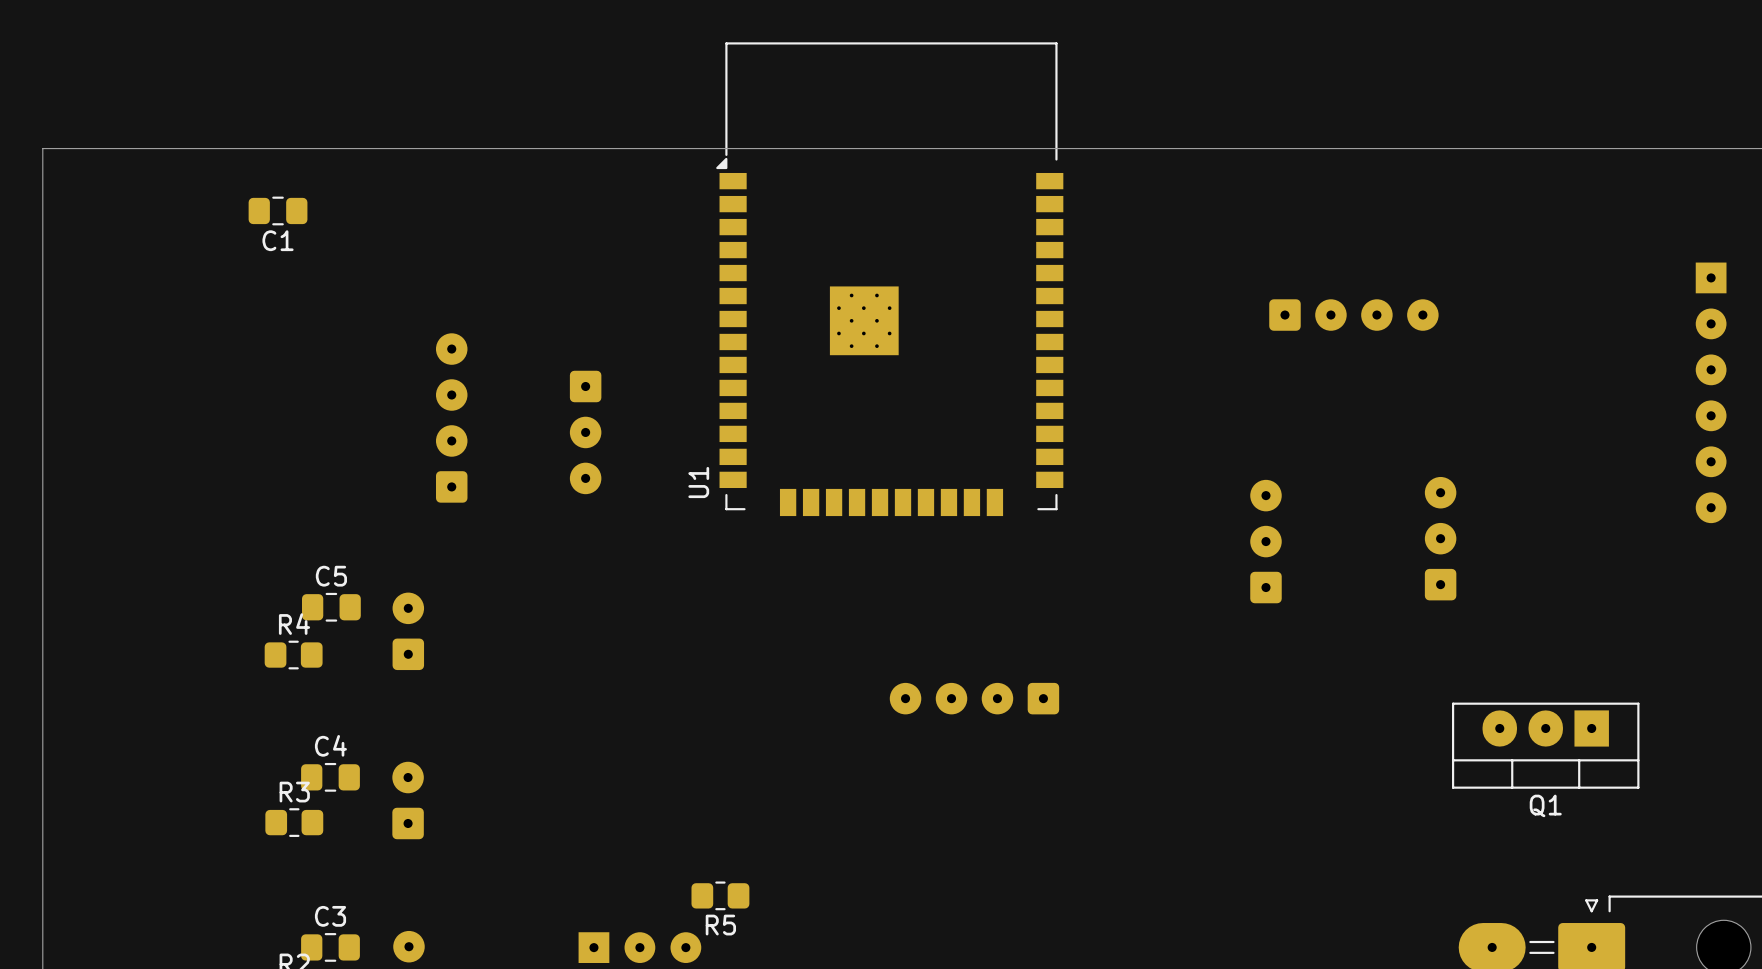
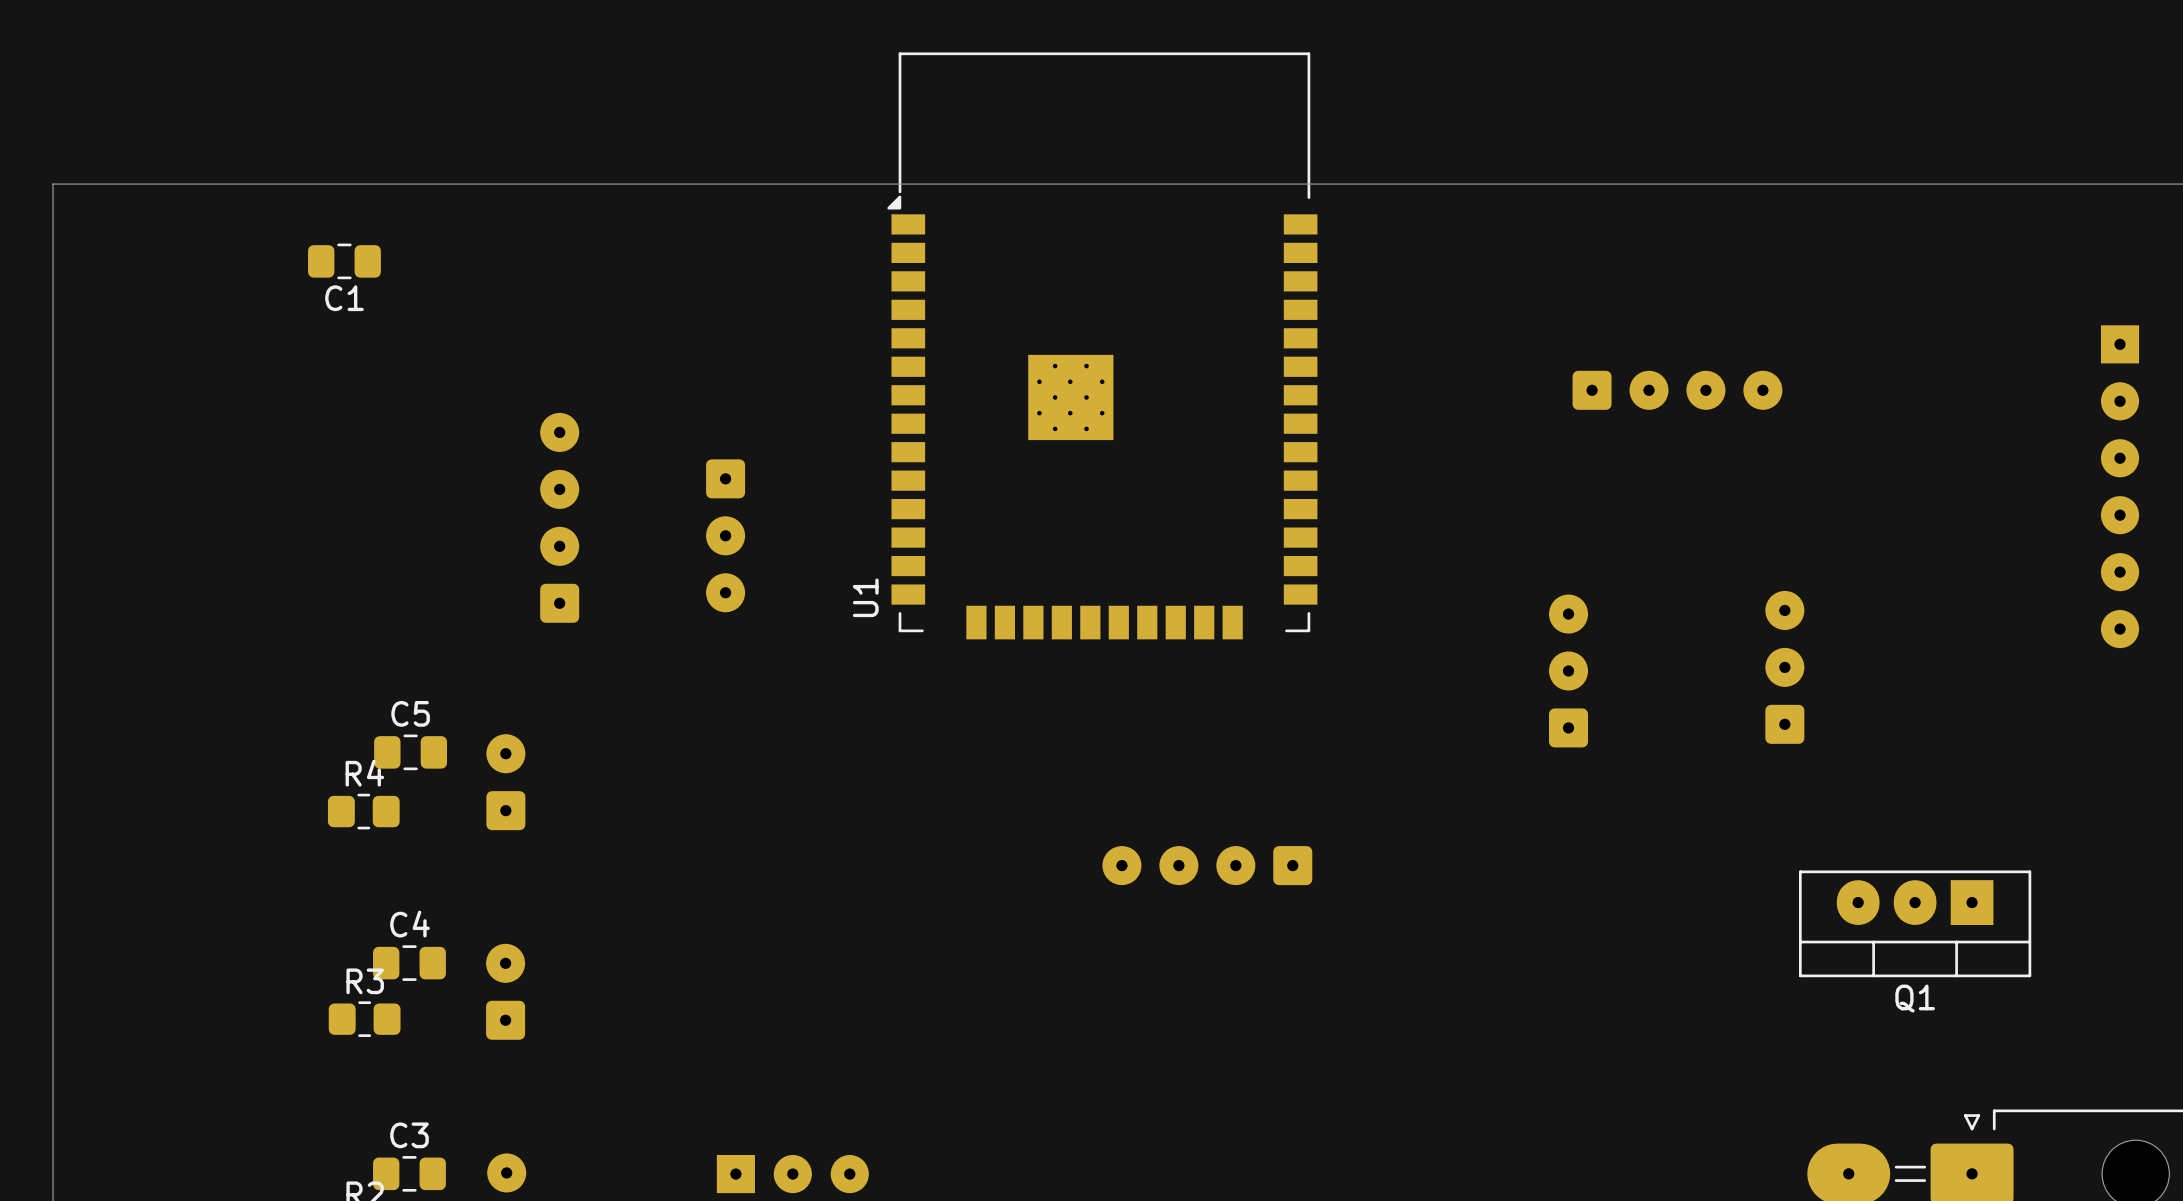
R5: (720, 895) -> none

